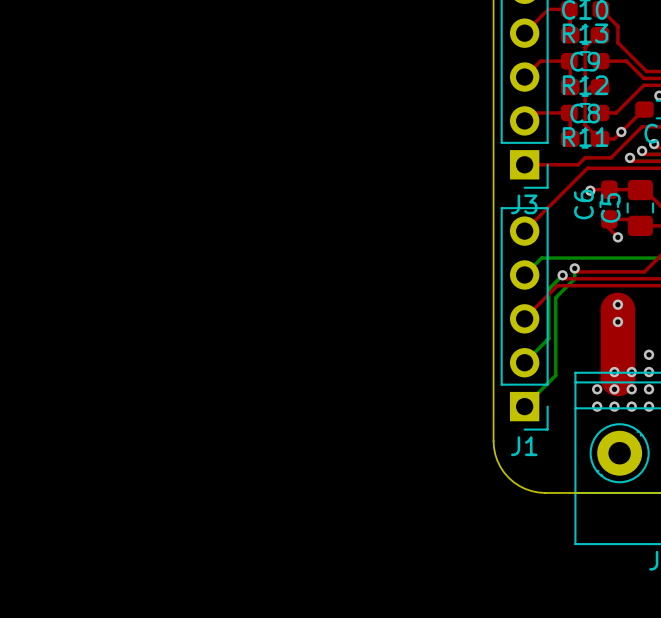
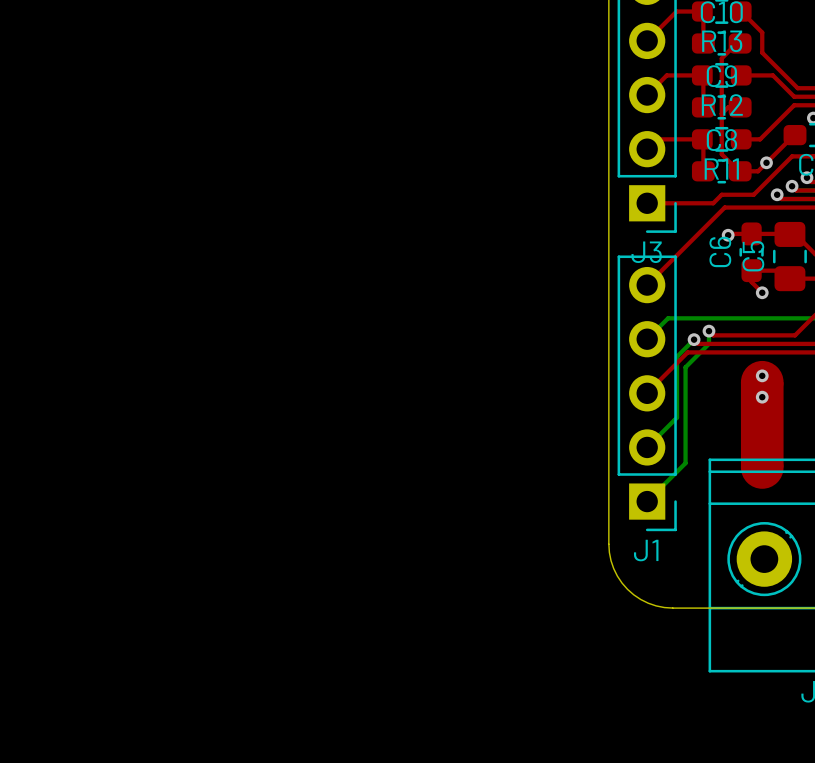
via: (649, 354) -> none
via: (614, 372) -> none
via: (631, 372) -> none
via: (649, 372) -> none
via: (597, 389) -> none
via: (614, 389) -> none
via: (631, 389) -> none
via: (649, 389) -> none
via: (597, 406) -> none
via: (614, 406) -> none
via: (631, 406) -> none
via: (649, 406) -> none

